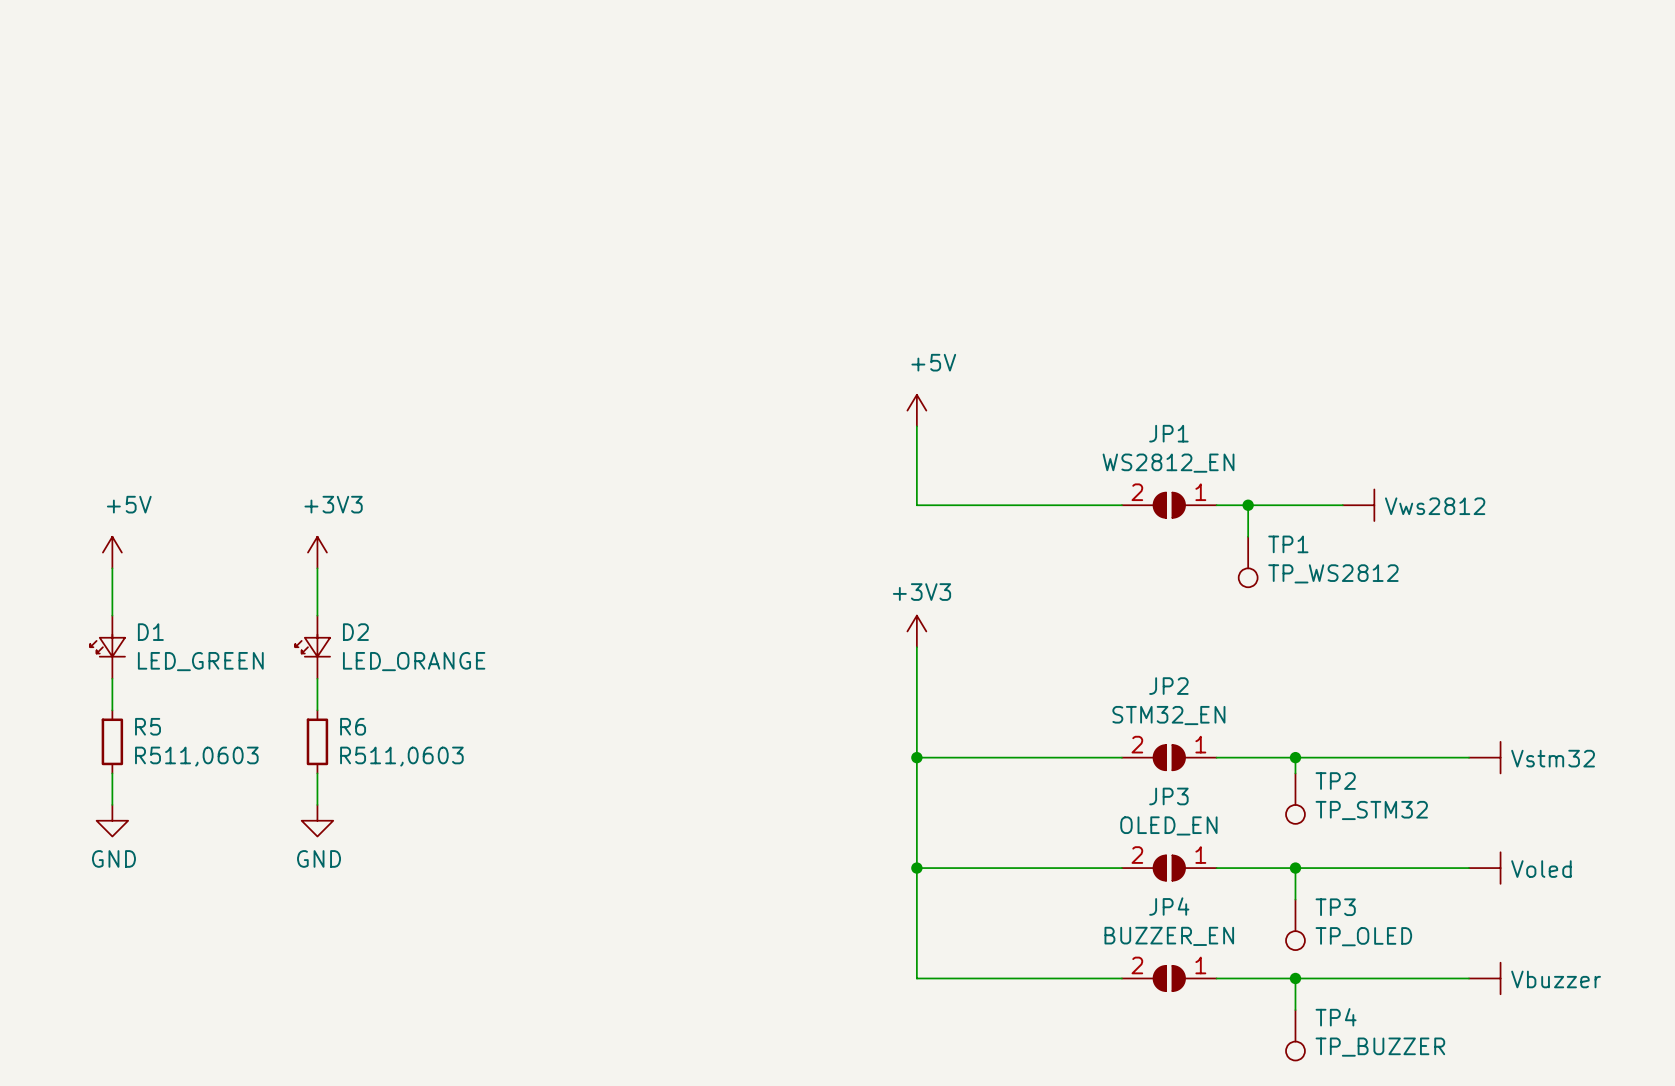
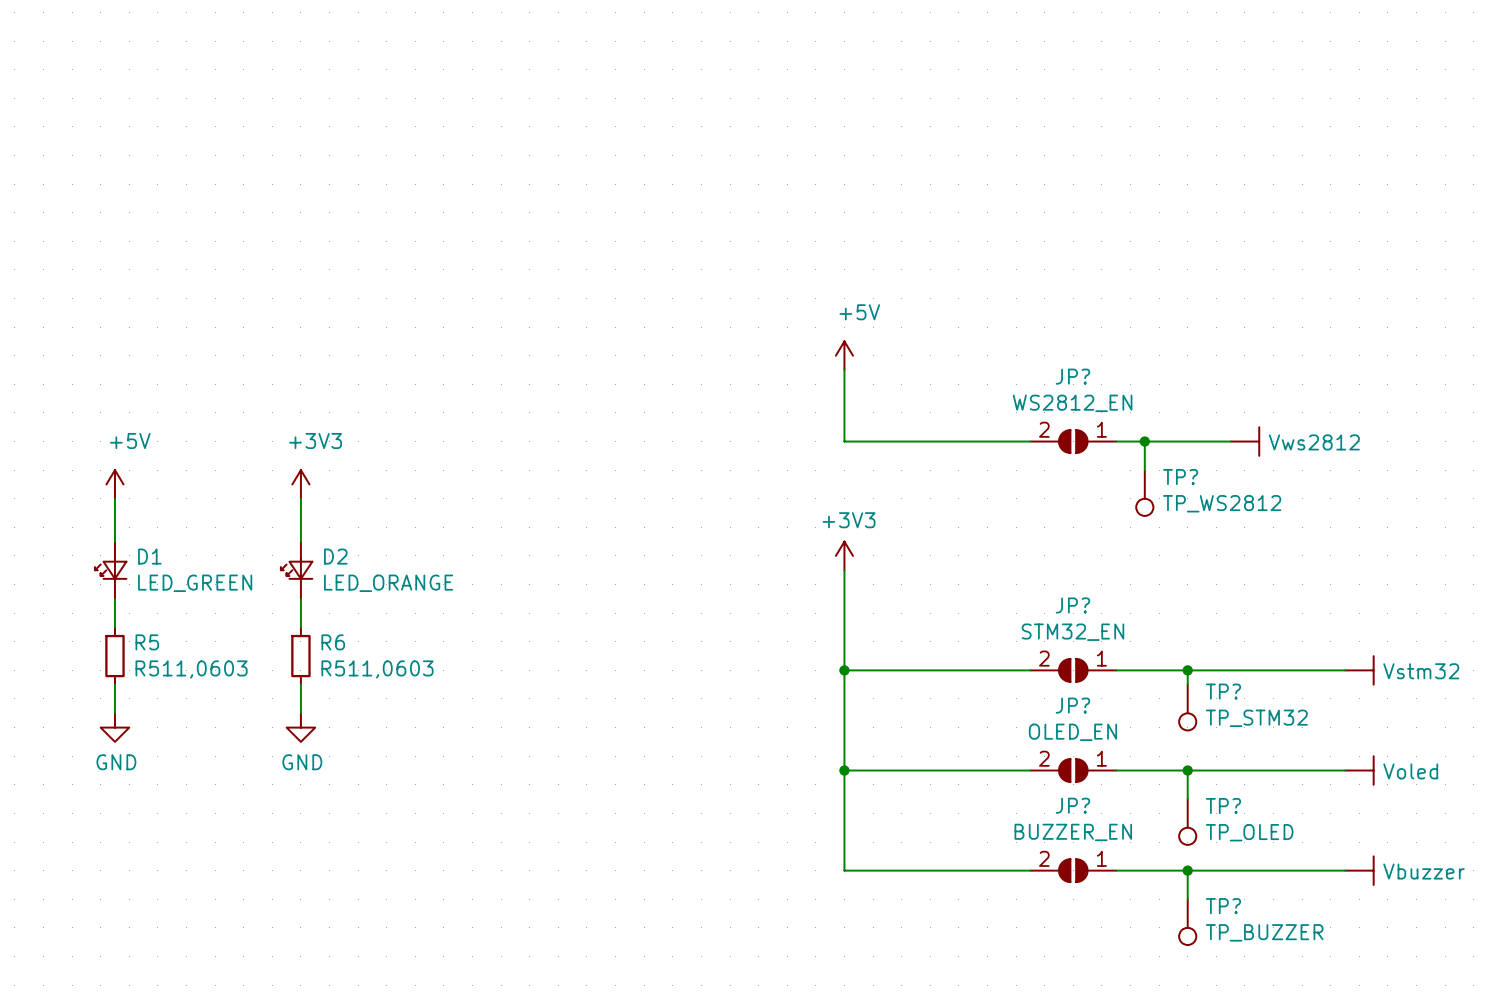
JP1 name: JP1 (1168, 433) -> JP? (1072, 376)
TP1 name: TP1 (1288, 544) -> TP? (1180, 477)
JP2 name: JP2 (1168, 686) -> JP? (1072, 605)
TP2 name: TP2 (1335, 781) -> TP? (1223, 691)
JP3 name: JP3 (1168, 796) -> JP? (1072, 705)
JP4 name: JP4 (1169, 906) -> JP? (1072, 805)
TP3 name: TP3 (1335, 907) -> TP? (1223, 806)
TP4 name: TP4 (1336, 1017) -> TP? (1223, 906)

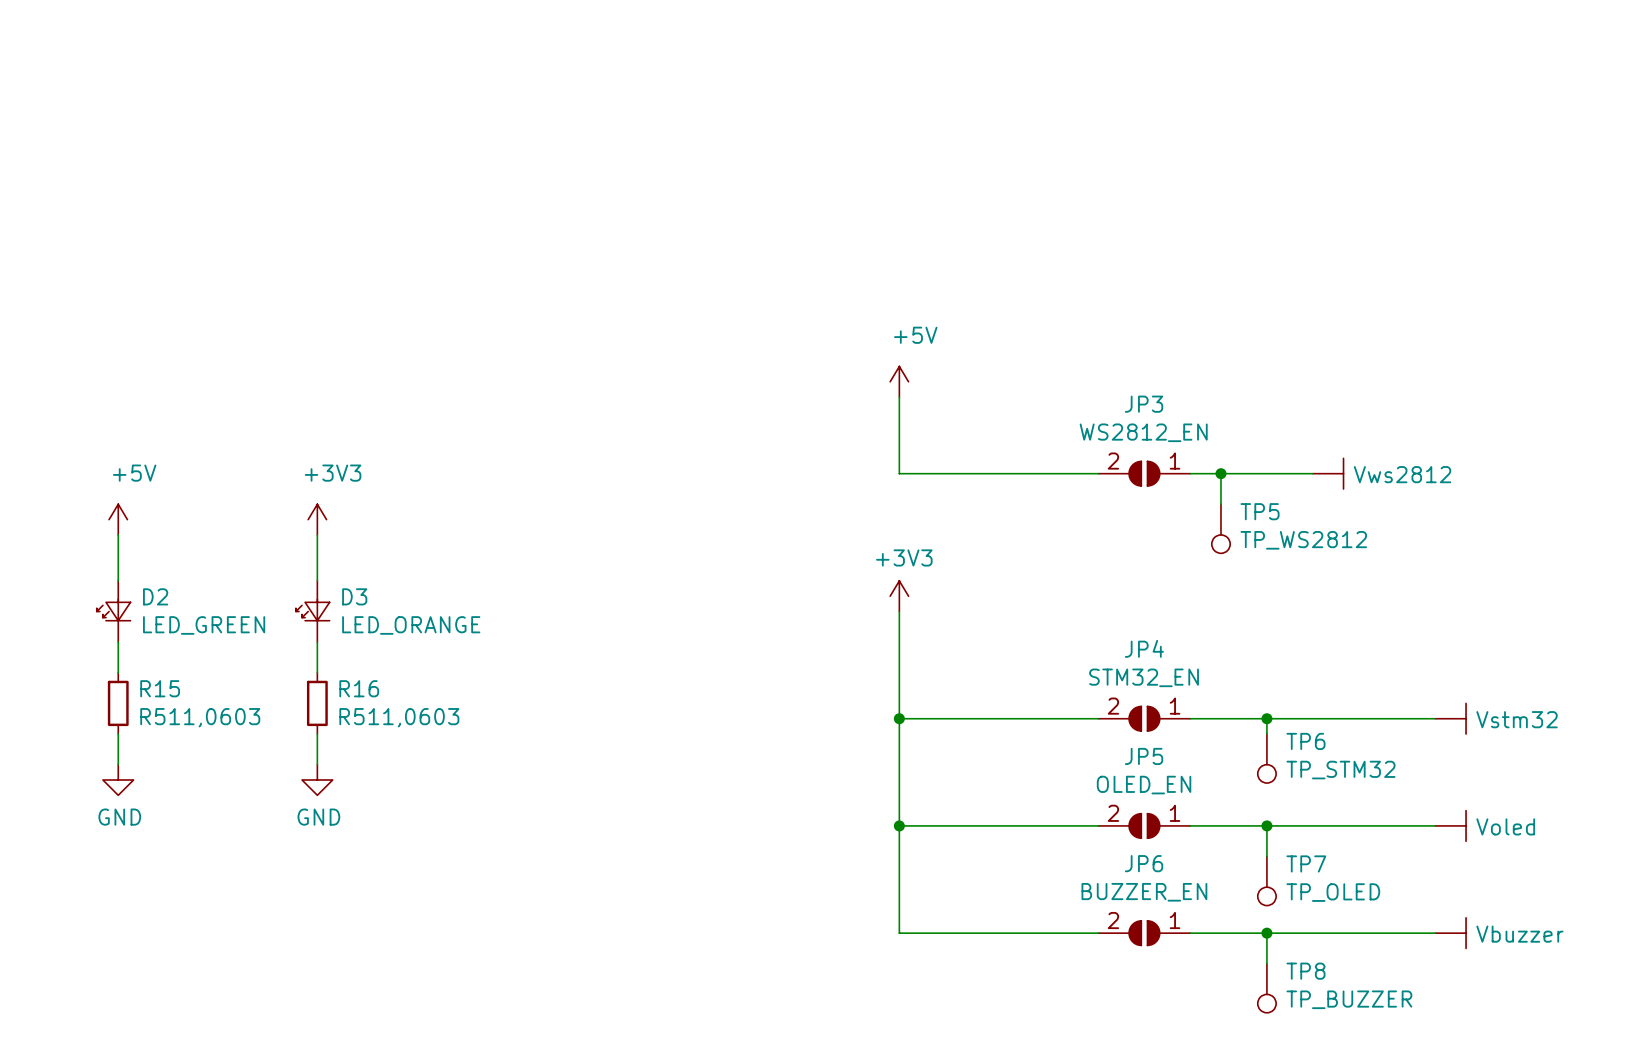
JP? name: JP? (1072, 376) -> JP3 (1144, 404)
TP? name: TP? (1180, 477) -> TP5 (1260, 511)
D1 name: D1 (149, 556) -> D2 (155, 596)
D2 name: D2 (335, 556) -> D3 (354, 596)
JP? name: JP? (1072, 605) -> JP4 (1144, 648)
R5 name: R5 (147, 642) -> R15 (160, 688)
R6 name: R6 (333, 642) -> R16 (359, 688)
TP? name: TP? (1223, 691) -> TP6 (1305, 741)
JP? name: JP? (1072, 705) -> JP5 (1144, 756)
JP? name: JP? (1072, 805) -> JP6 (1144, 863)
TP? name: TP? (1223, 806) -> TP7 (1306, 863)
TP? name: TP? (1223, 906) -> TP8 (1305, 971)

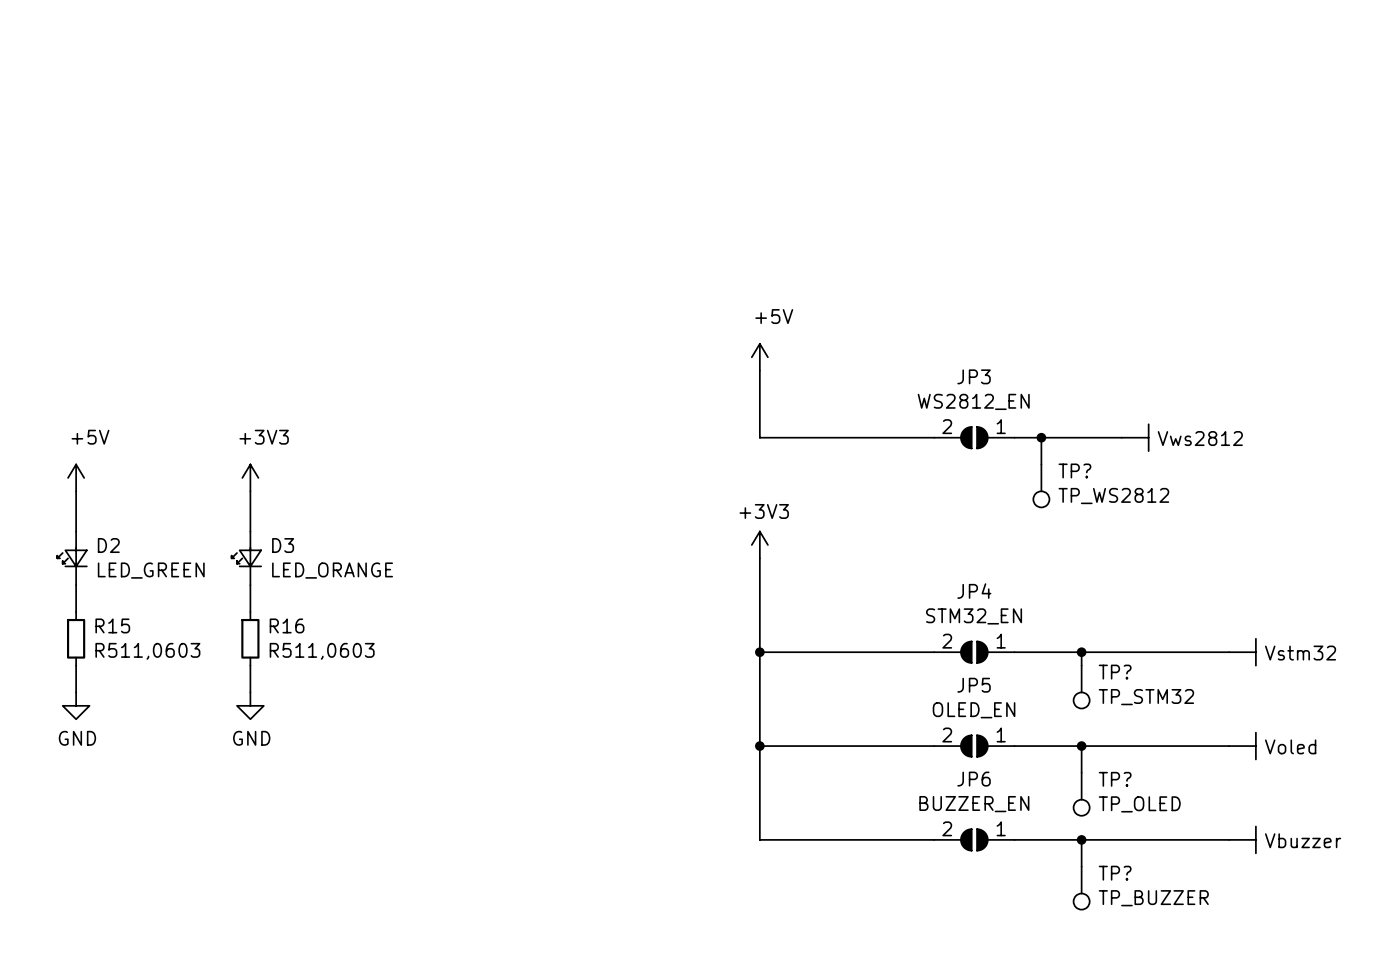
TP5 name: TP5 (1260, 511) -> TP? (1074, 470)
TP6 name: TP6 (1305, 741) -> TP? (1115, 672)
TP7 name: TP7 (1306, 863) -> TP? (1115, 779)
TP8 name: TP8 (1305, 971) -> TP? (1115, 873)

